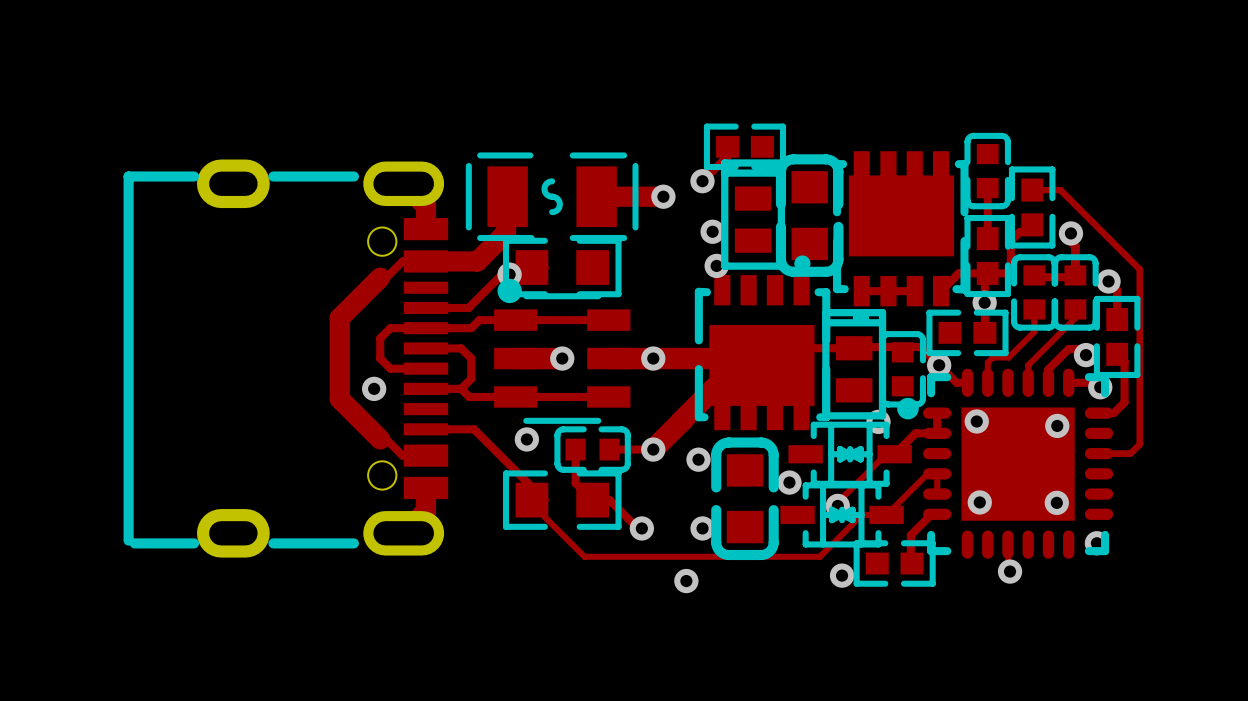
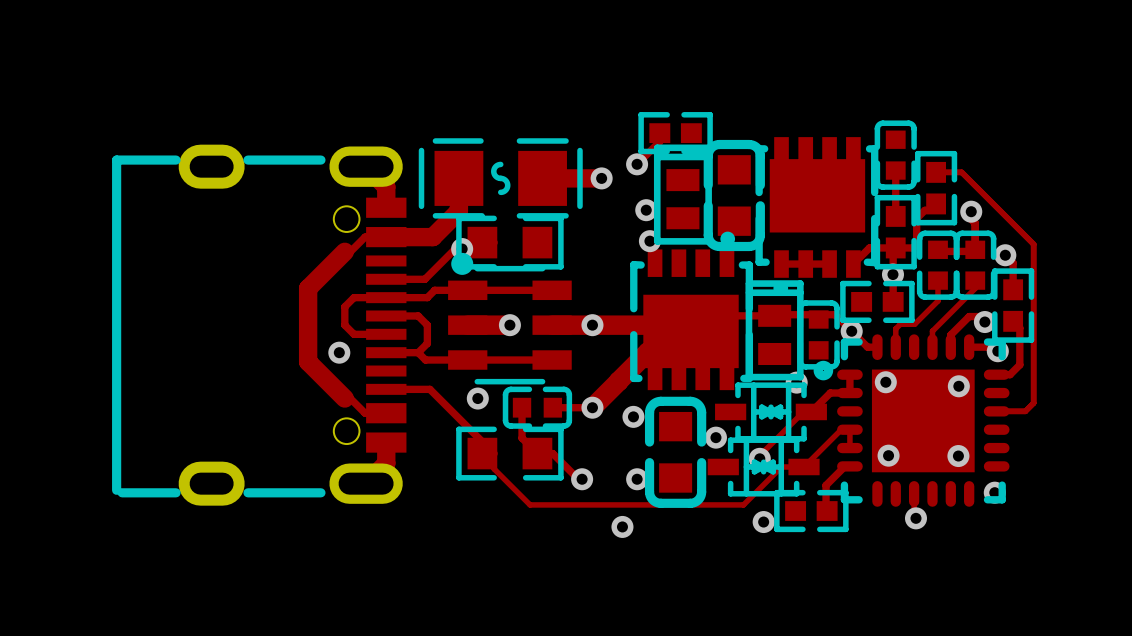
part footprint: [465, 152, 639, 242] -> [418, 138, 583, 219]

